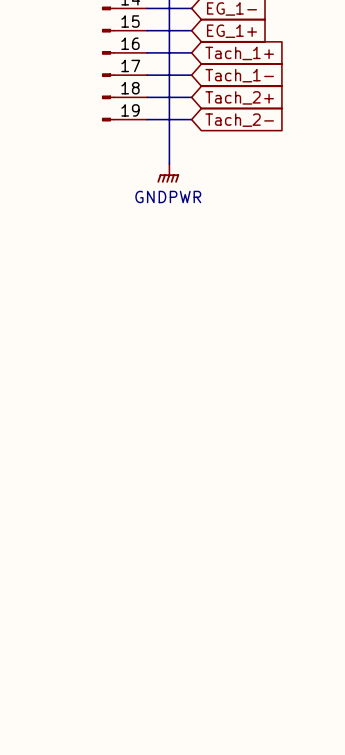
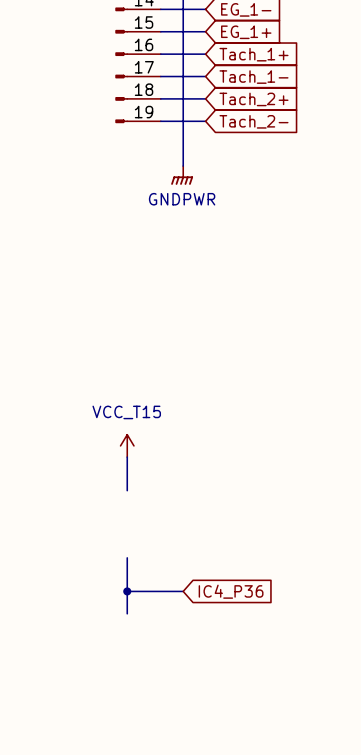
power symbol: none -> VCC_T15 (127, 445)
wire: none -> (127, 457) (127, 490)
wire: none -> (127, 557) (127, 613)
wire: none -> (127, 591) (183, 591)
junction: none -> (127, 591)
global label: none -> IC4_P36 (231, 591)

